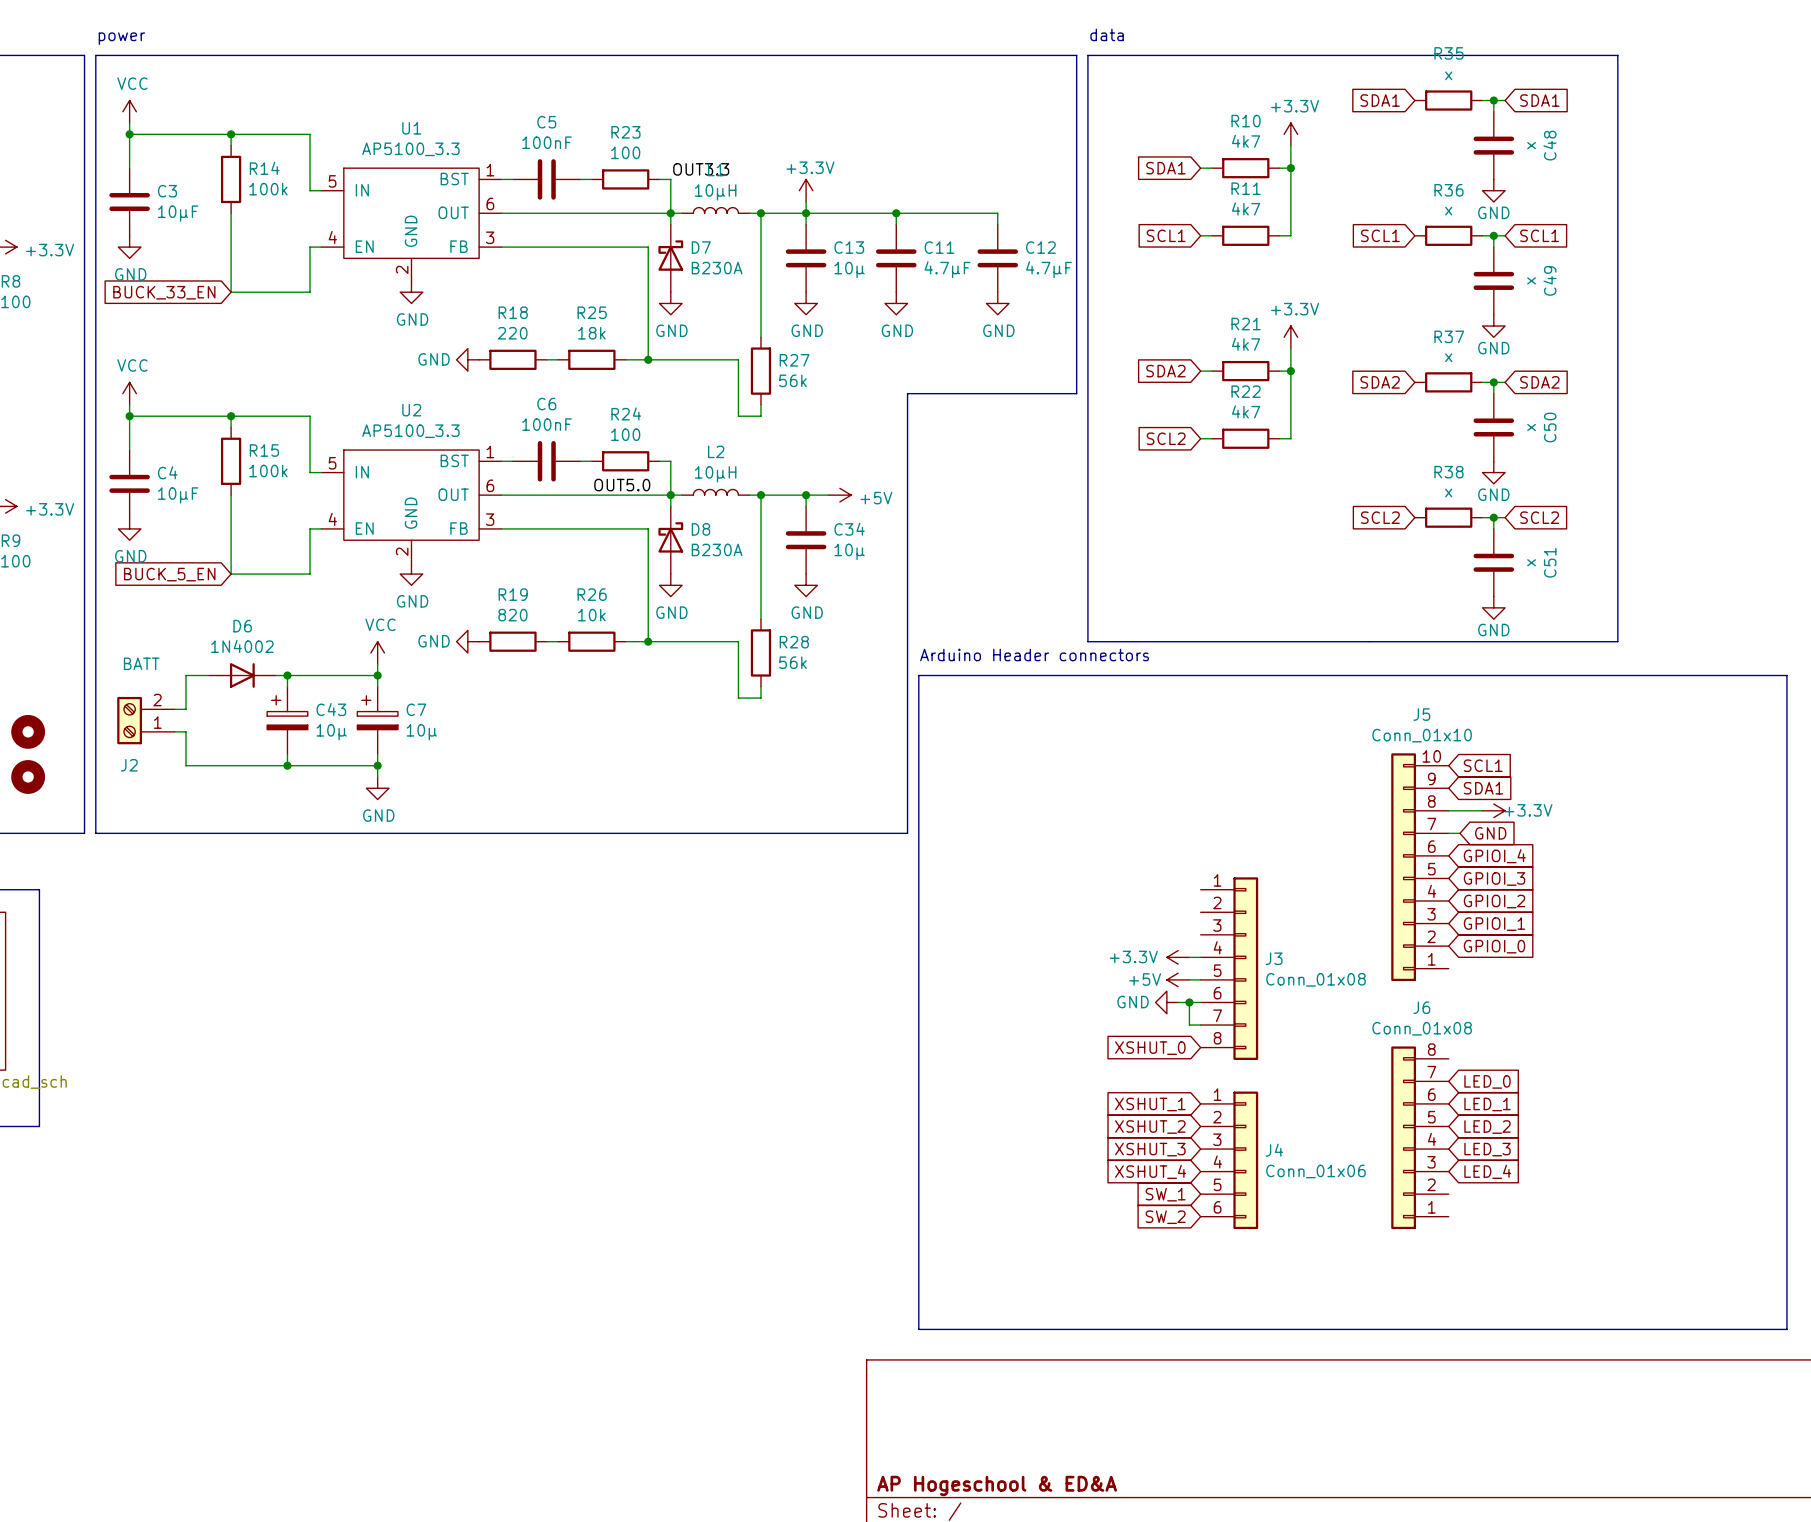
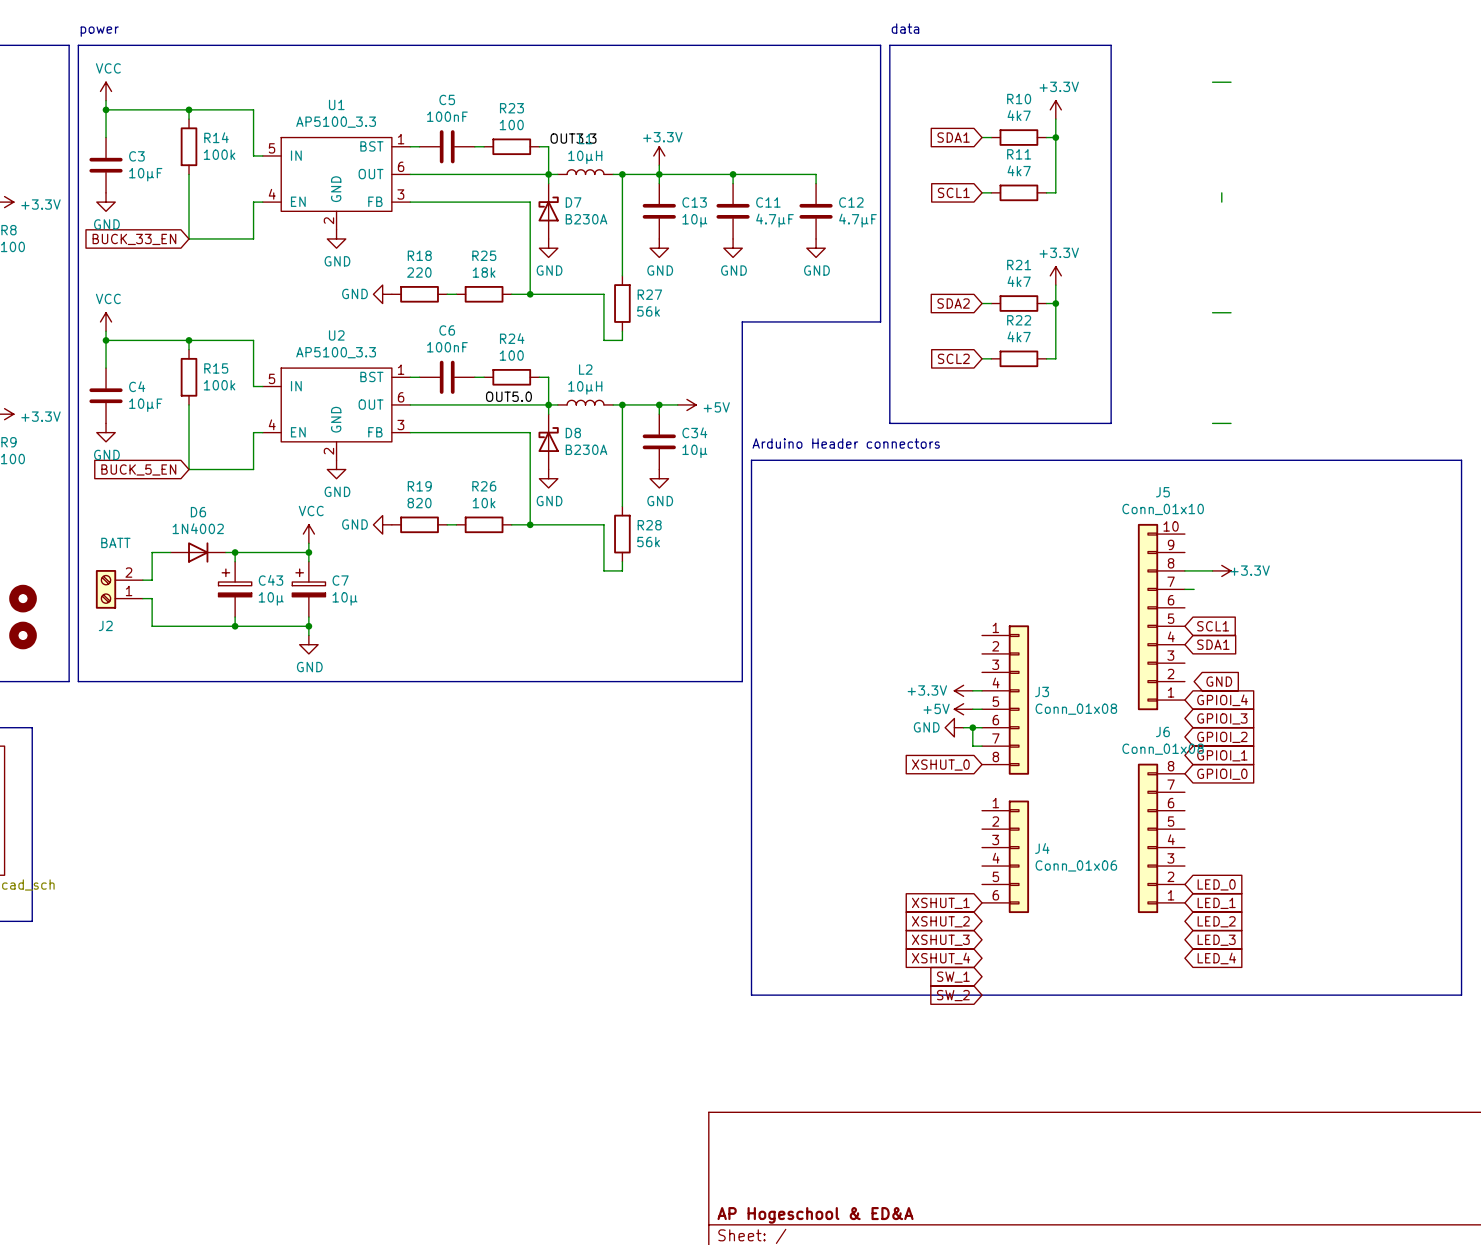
line: (1358, 55) (1617, 55) (1617, 641) (1087, 641) (1087, 517) -> (1111, 45) (1111, 423) (889, 423)
global label: SDA1 (1380, 100) -> none
R35: x (1448, 100) -> none
wire: (1493, 100) (1493, 111) -> none
junction: (1493, 100) -> none
global label: SDA1 (1539, 100) -> none
C48: x (1493, 145) -> none
power symbol: GND (1493, 190) -> none
global label: SCL1 (1380, 235) -> none
R36: x (1448, 235) -> none
wire: (1482, 235) (1505, 235) -> none
junction: (1493, 235) -> none
global label: SCL1 (1539, 235) -> none
C49: x (1493, 280) -> none
power symbol: GND (1493, 326) -> none
global label: SDA2 (1380, 382) -> none
R37: x (1448, 382) -> none
wire: (1493, 382) (1493, 393) -> none
junction: (1493, 382) -> none
global label: SDA2 (1539, 382) -> none
C50: x (1493, 427) -> none
power symbol: GND (1493, 472) -> none
global label: SCL2 (1380, 517) -> none
R38: x (1448, 517) -> none
wire: (1493, 517) (1493, 528) -> none
junction: (1493, 517) -> none
global label: SCL2 (1539, 517) -> none
C51: x (1493, 562) -> none
power symbol: GND (1493, 607) -> none
text position: Arduino Header connectors (1034, 655) -> Arduino Header connectors (846, 443)
line: (918, 675) (1786, 675) -> (751, 552) (751, 460) (1461, 460) (1461, 552)
wire: (1448, 810) (1482, 810) -> (1184, 570) (1212, 570)
power symbol position: +3.3V (1493, 810) -> +3.3V (1221, 570)
wire: (1448, 833) (1459, 833) -> (1184, 589) (1194, 589)
J5 position: (1419, 867) -> (1161, 617)
junction: none -> (972, 727)
power symbol position: +3.3V (1178, 957) -> +3.3V (963, 690)
wire: (1189, 957) (1200, 957) -> (972, 690) (982, 690)
J3 position: (1229, 968) -> (1005, 700)
power symbol position: +5V (1178, 979) -> +5V (963, 709)
wire: (1189, 979) (1200, 979) -> (972, 709) (982, 709)
power symbol position: GND (1166, 1002) -> GND (954, 727)
wire: (1178, 1002) (1200, 1002) -> (963, 727) (982, 727)
wire: (1189, 1002) (1189, 1025) (1200, 1025) -> (972, 727) (972, 746) (982, 746)
junction: (1189, 1002) -> none
global label position: XSHUT_0 (1150, 1048) -> XSHUT_0 (940, 765)
J6 position: (1419, 1137) -> (1161, 838)
J4 position: (1229, 1160) -> (1005, 856)
line: (918, 1216) (918, 1329) (1786, 1329) (1786, 1216) -> (751, 995) (1461, 995)

